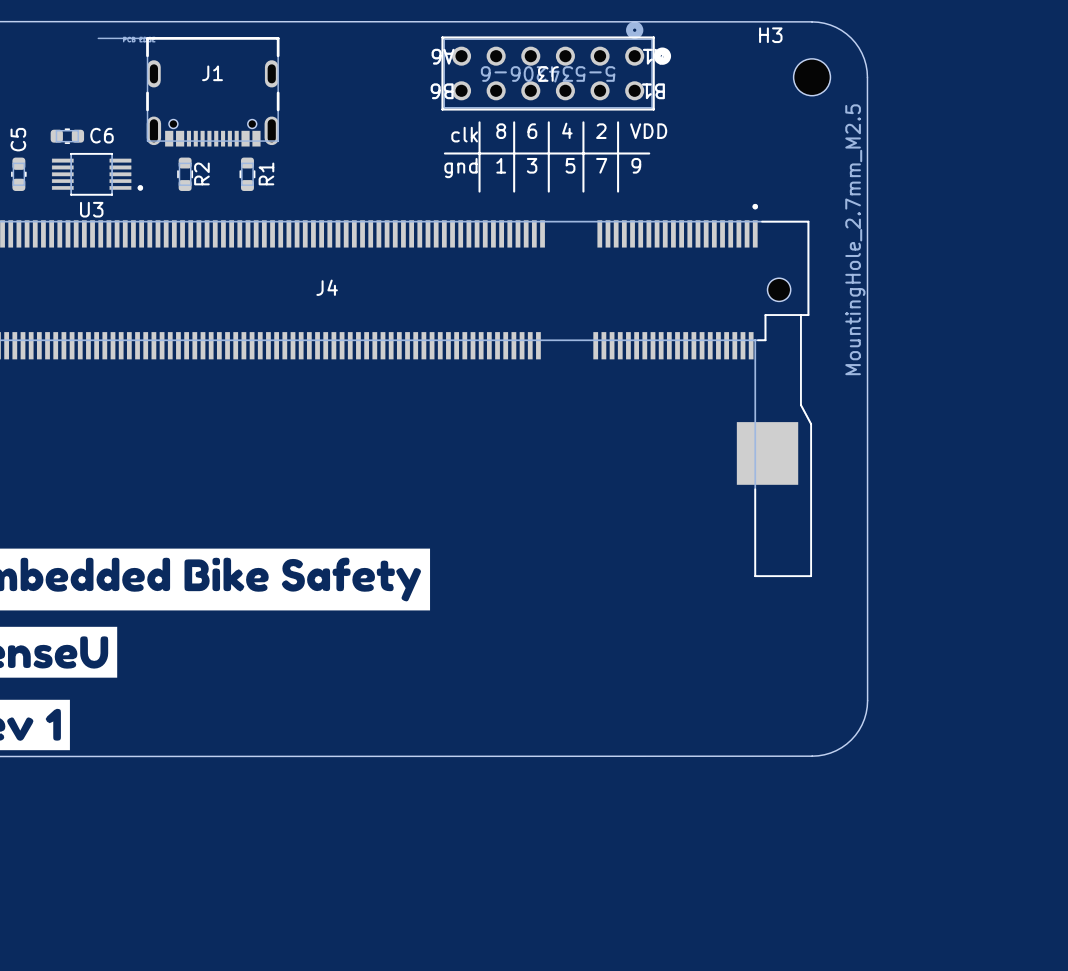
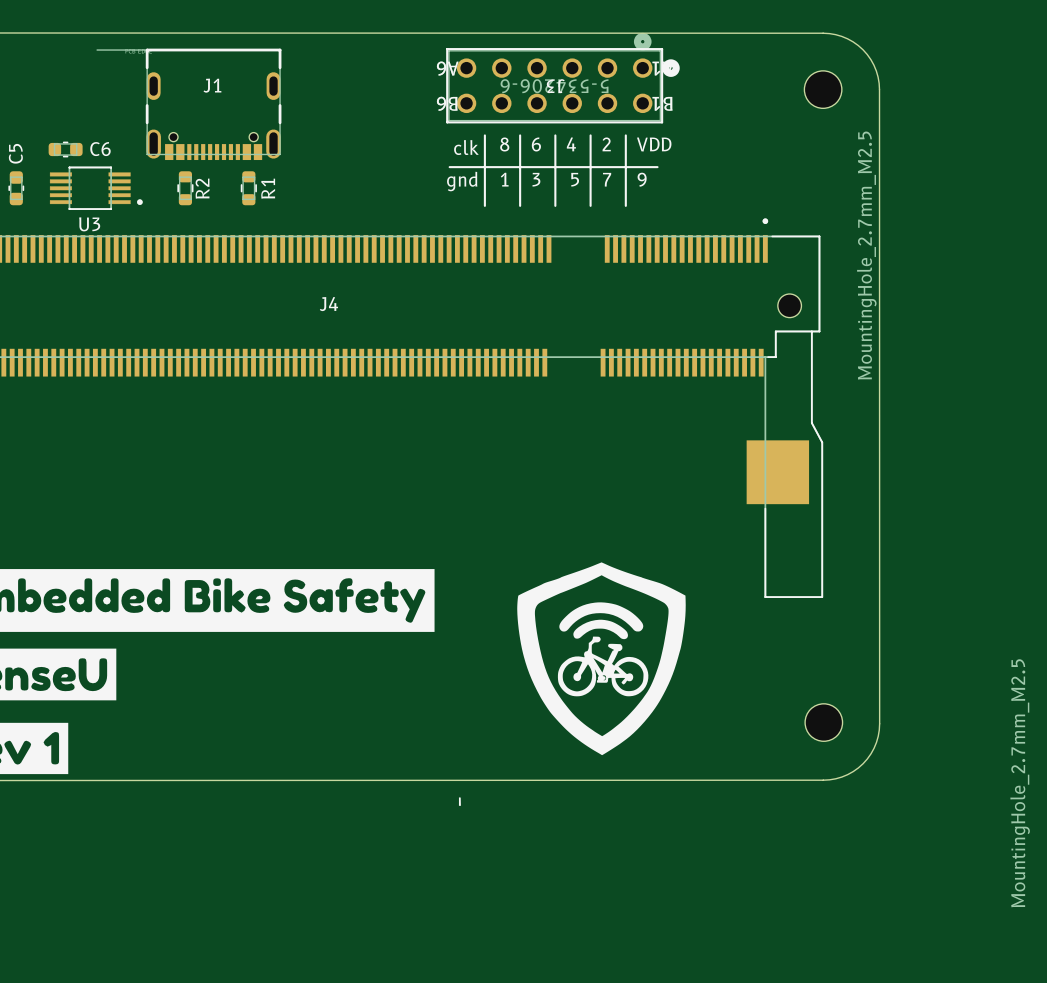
H3 name: H3 (770, 35) -> none
drawing: none -> [458, 562, 686, 806]
part: none -> MountingHole_2.7mm_M2.5 (823, 722)

